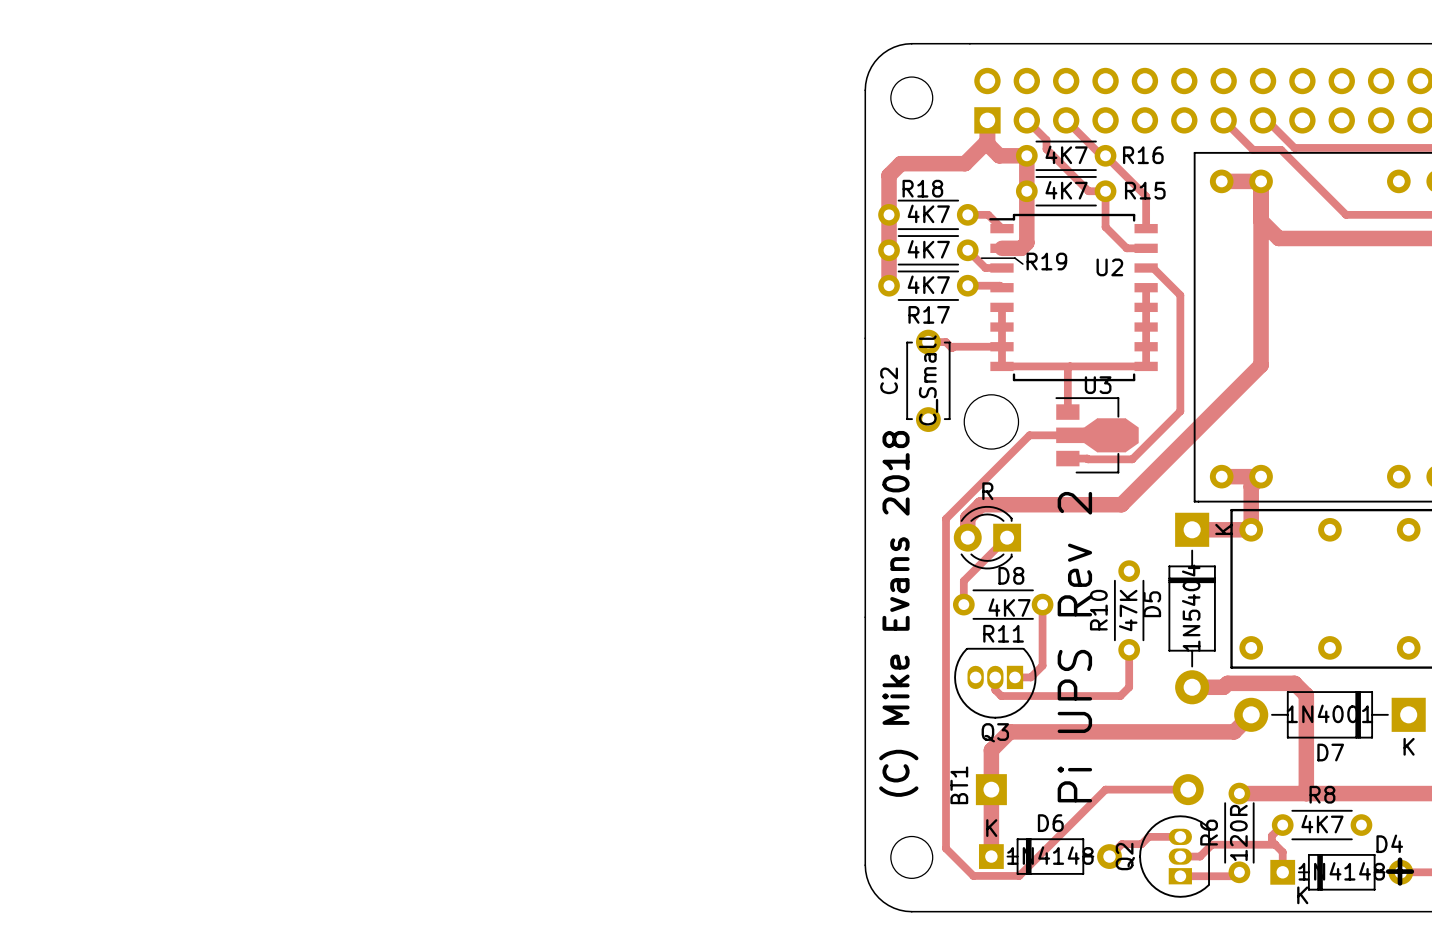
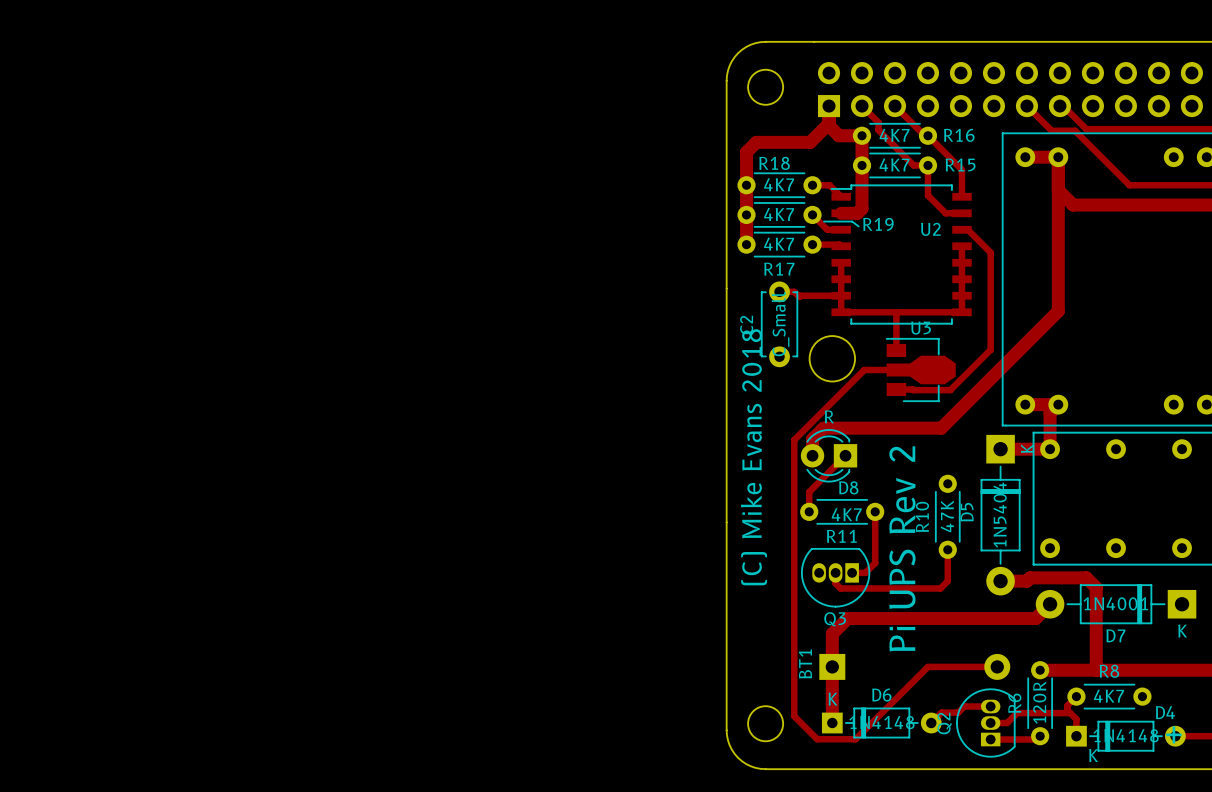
text position: (C) Mike Evans 2018 (898, 613) -> (C) Mike Evans 2018 (753, 457)

